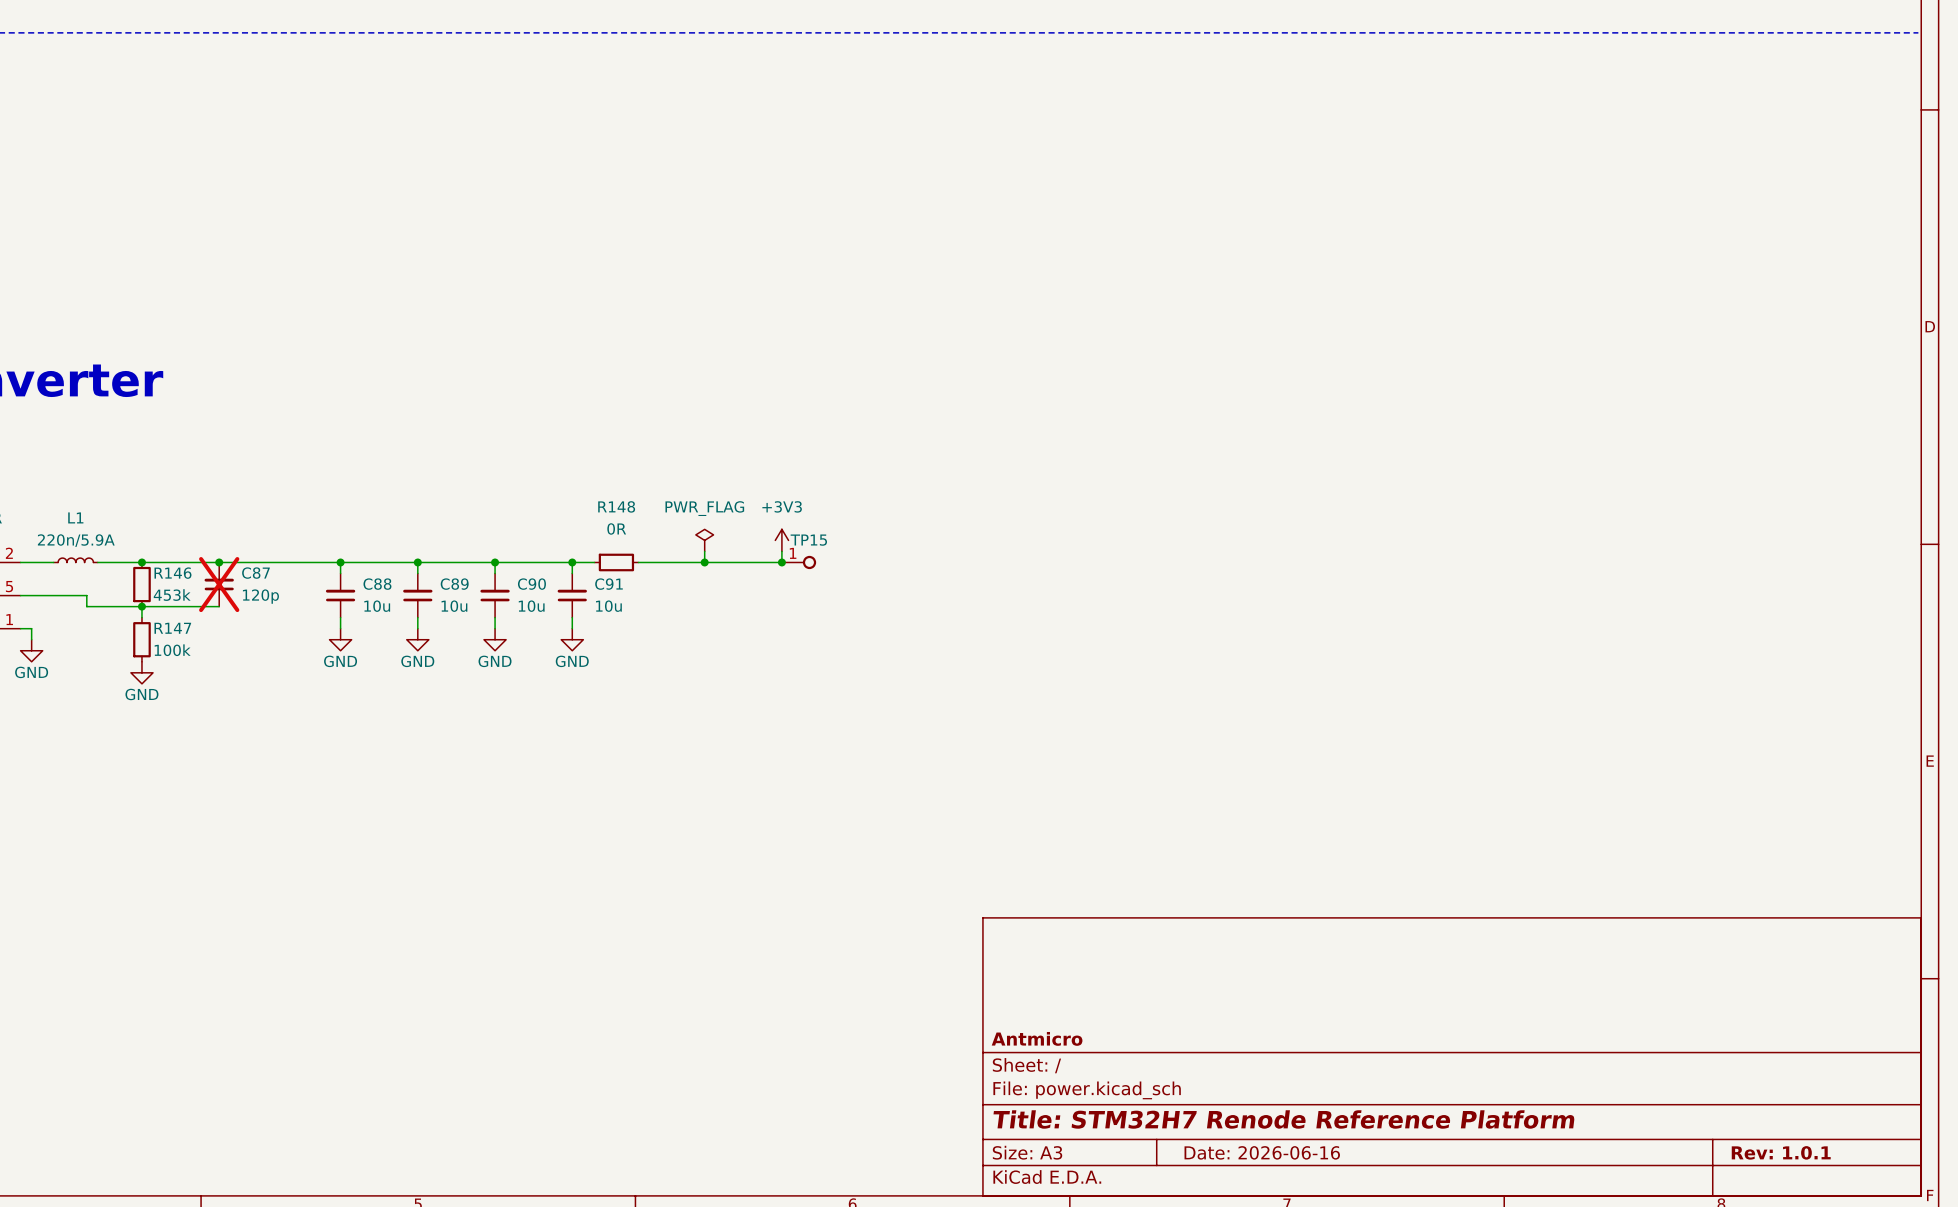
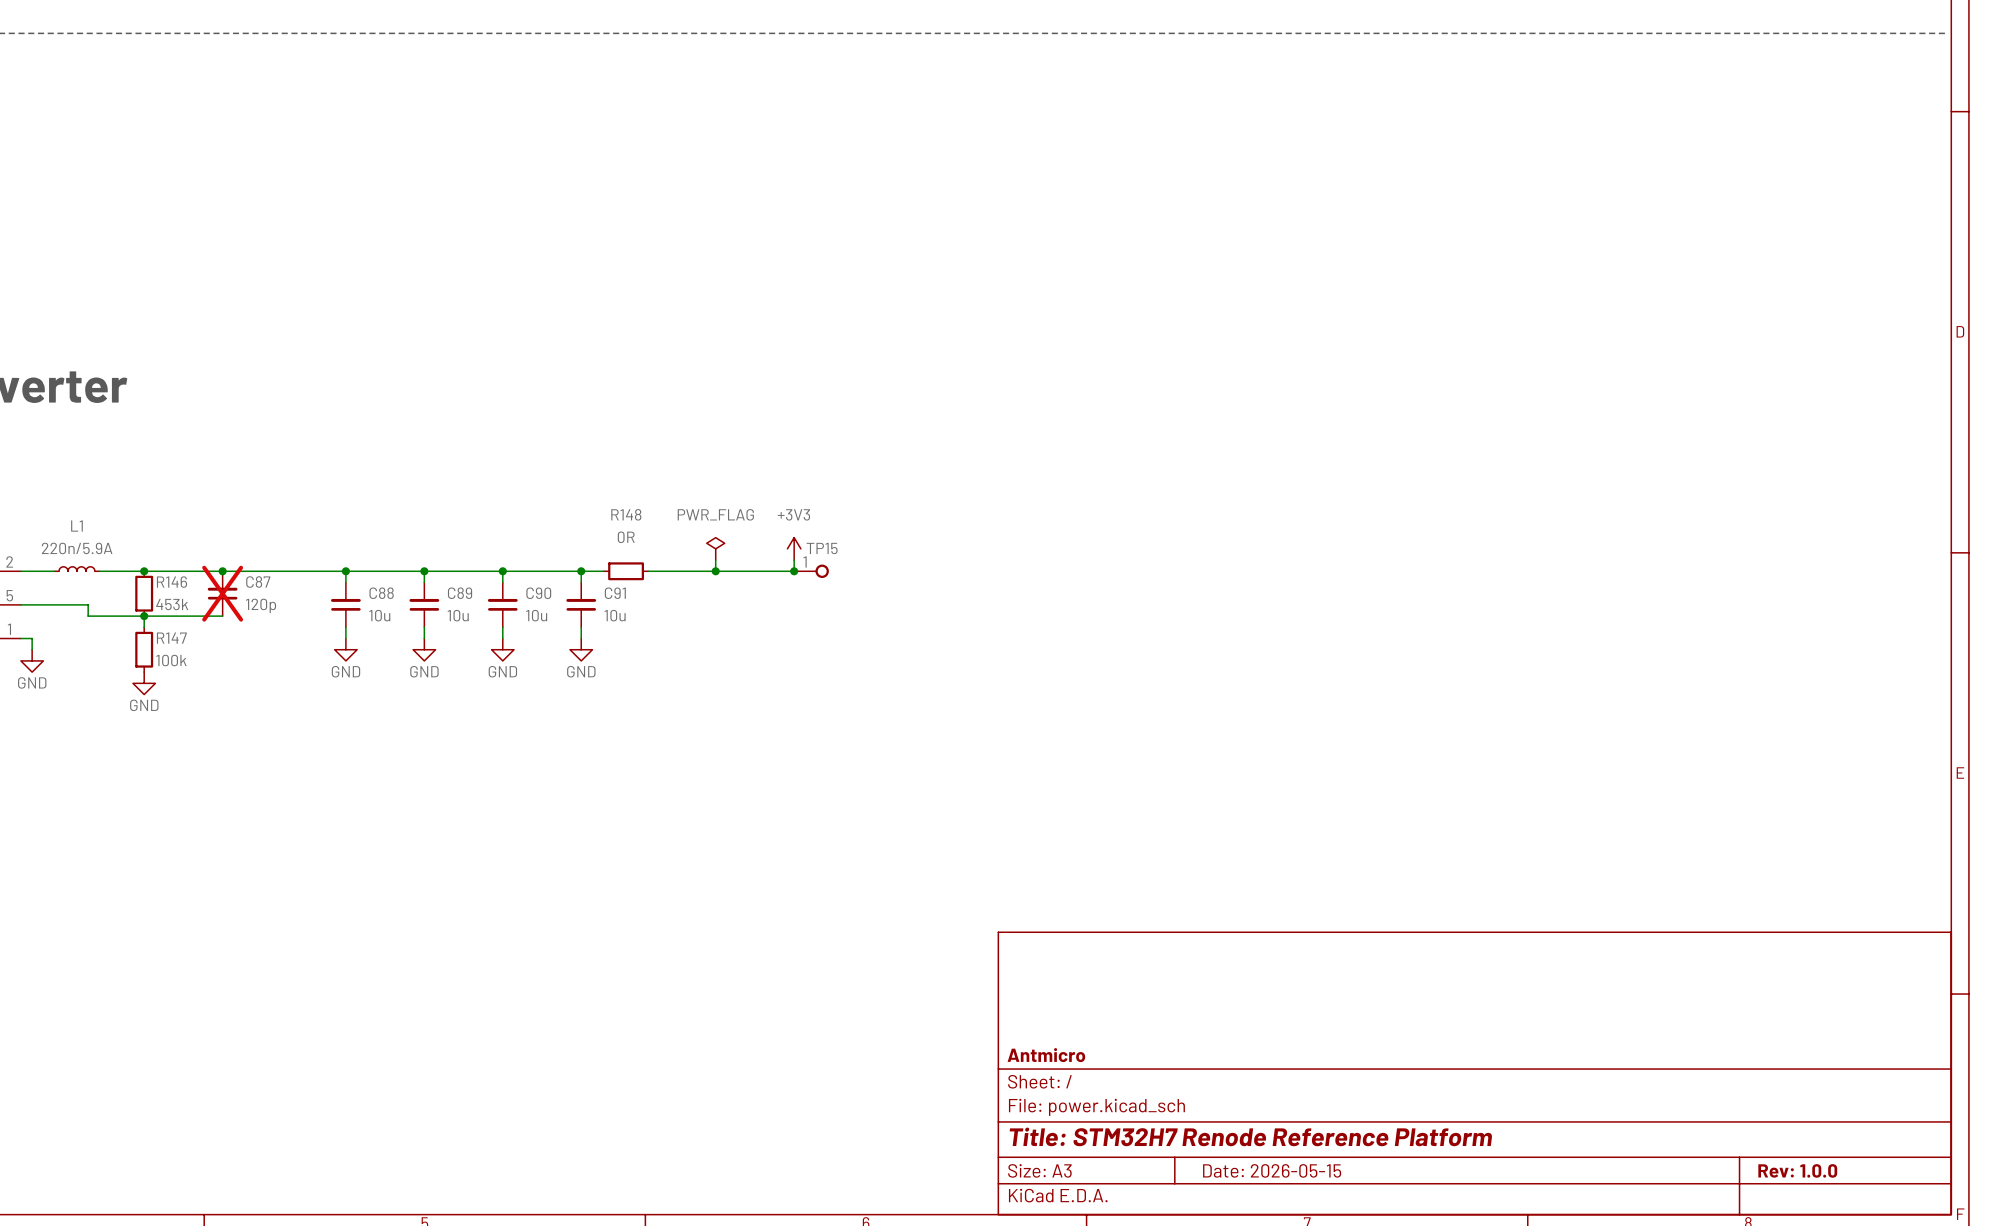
title block: Date: 2026-06-16 (1262, 1152) -> Date: 2026-05-15 (1272, 1170)
title block: Rev: 1.0.1 (1781, 1152) -> Rev: 1.0.0 (1797, 1170)

